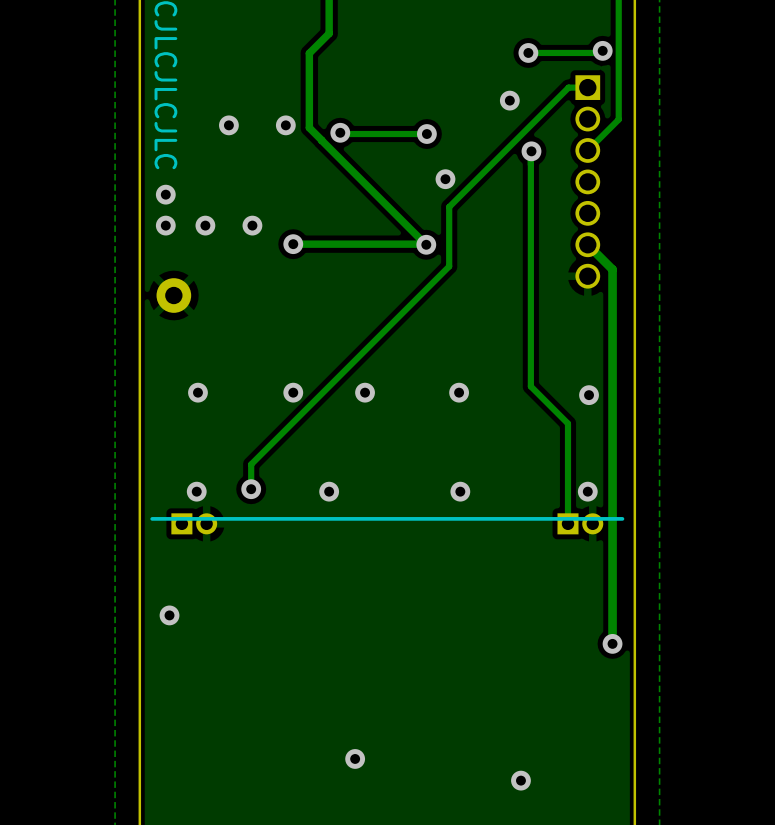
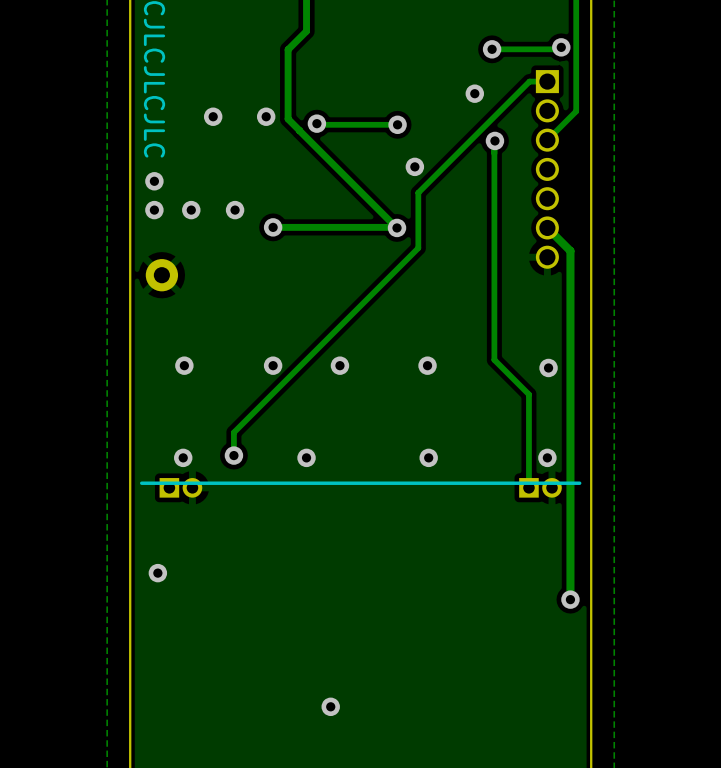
via: (520, 780) -> none

